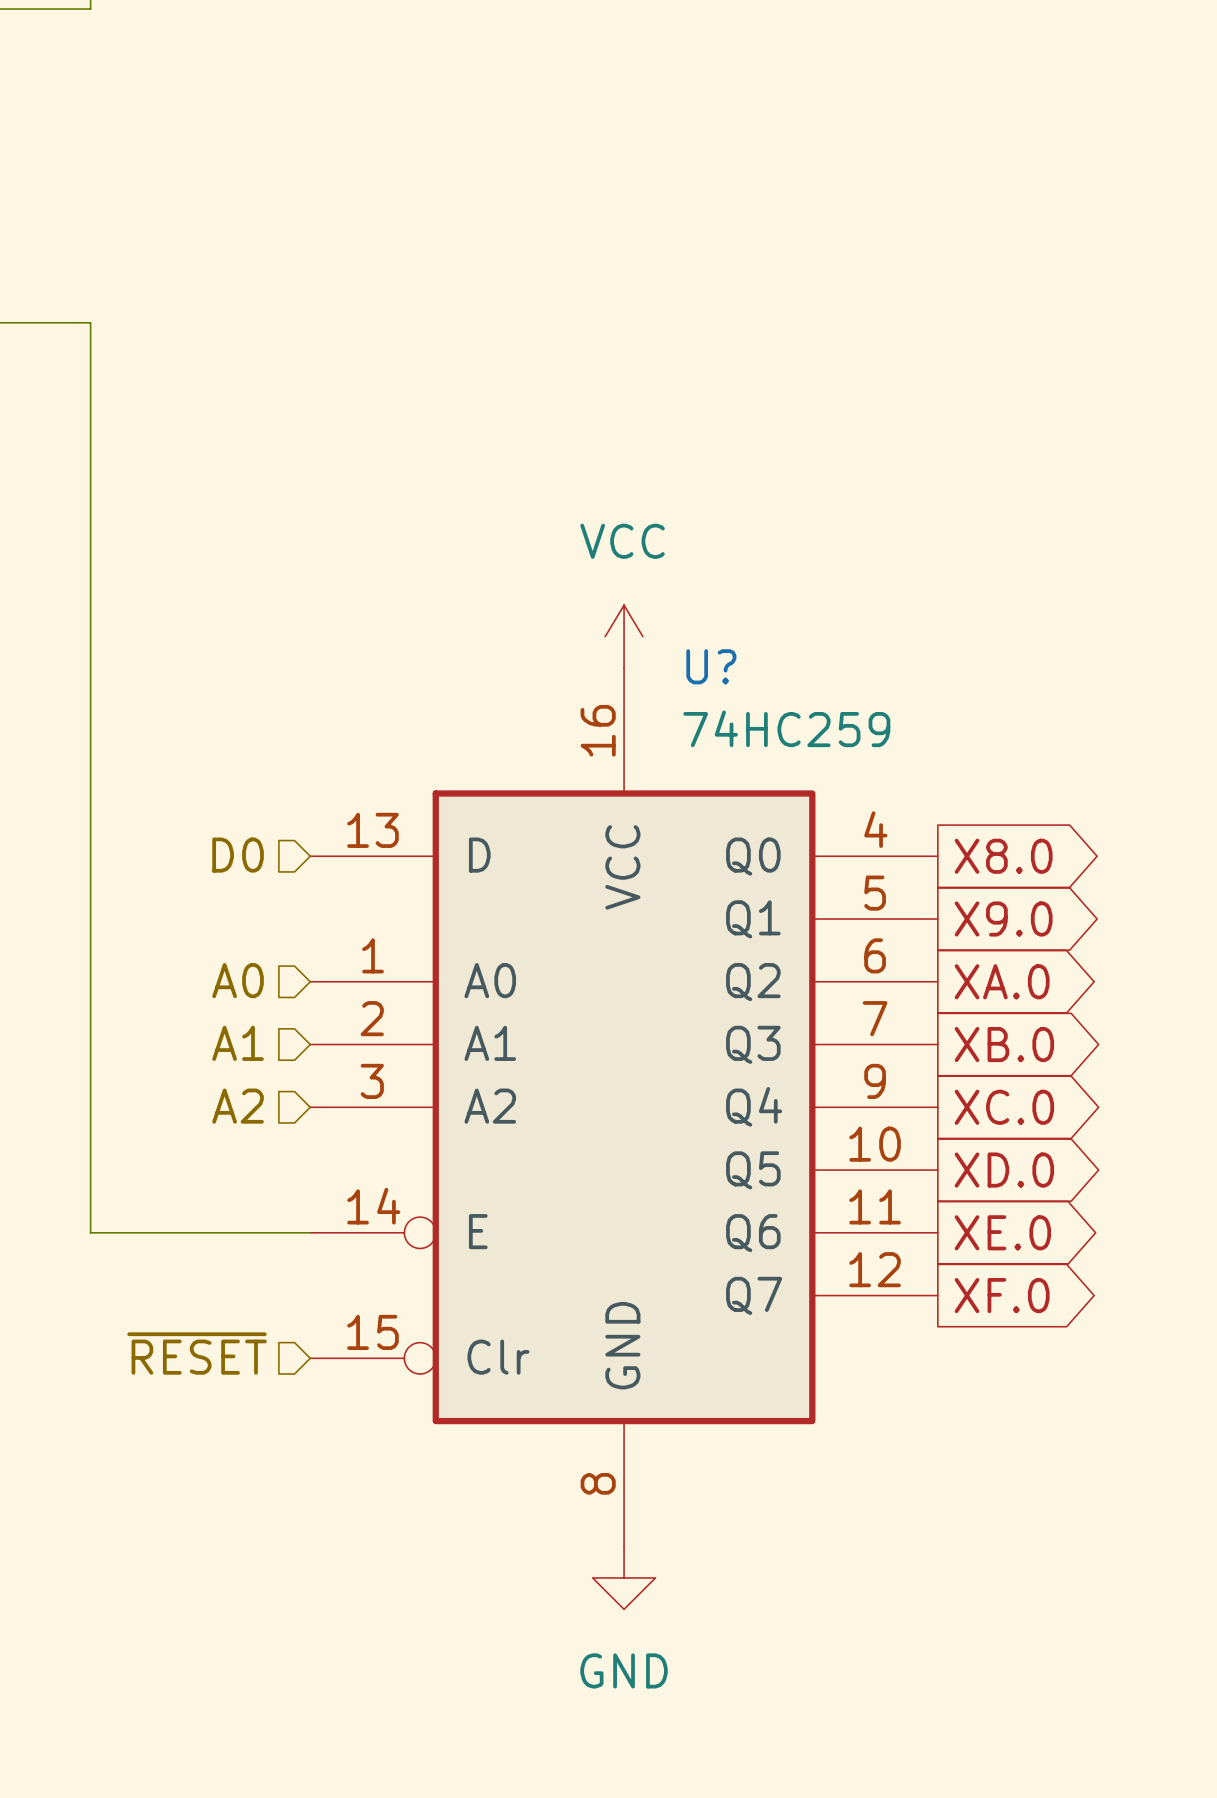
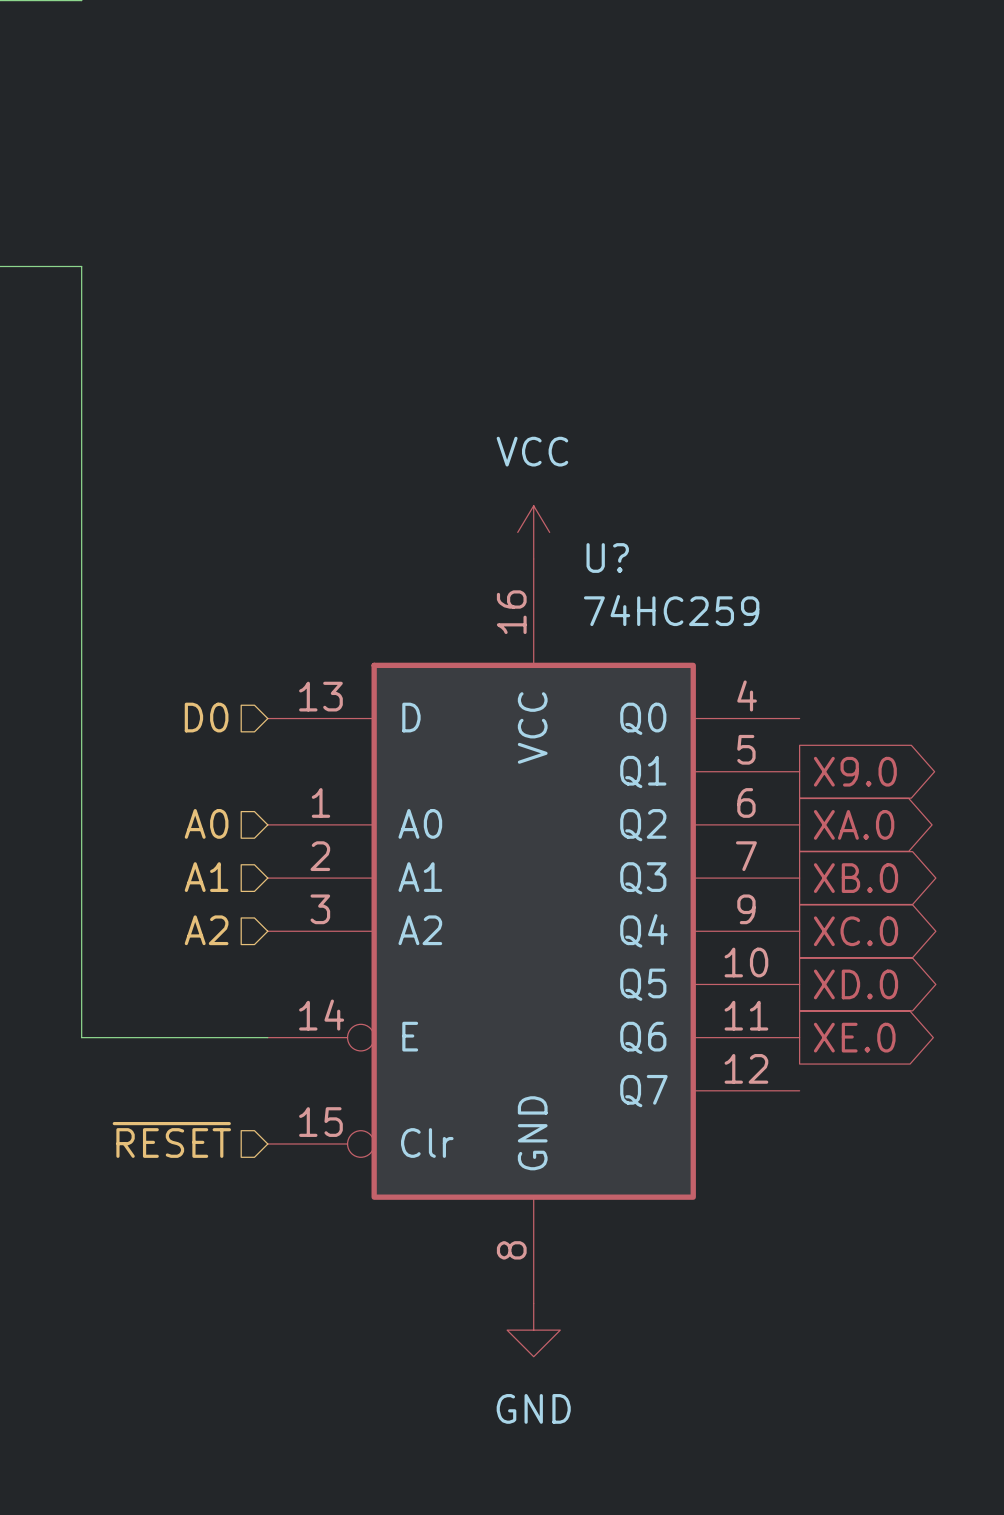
global label: X8.0 (1003, 856) -> none
global label: XF.0 (1002, 1295) -> none

